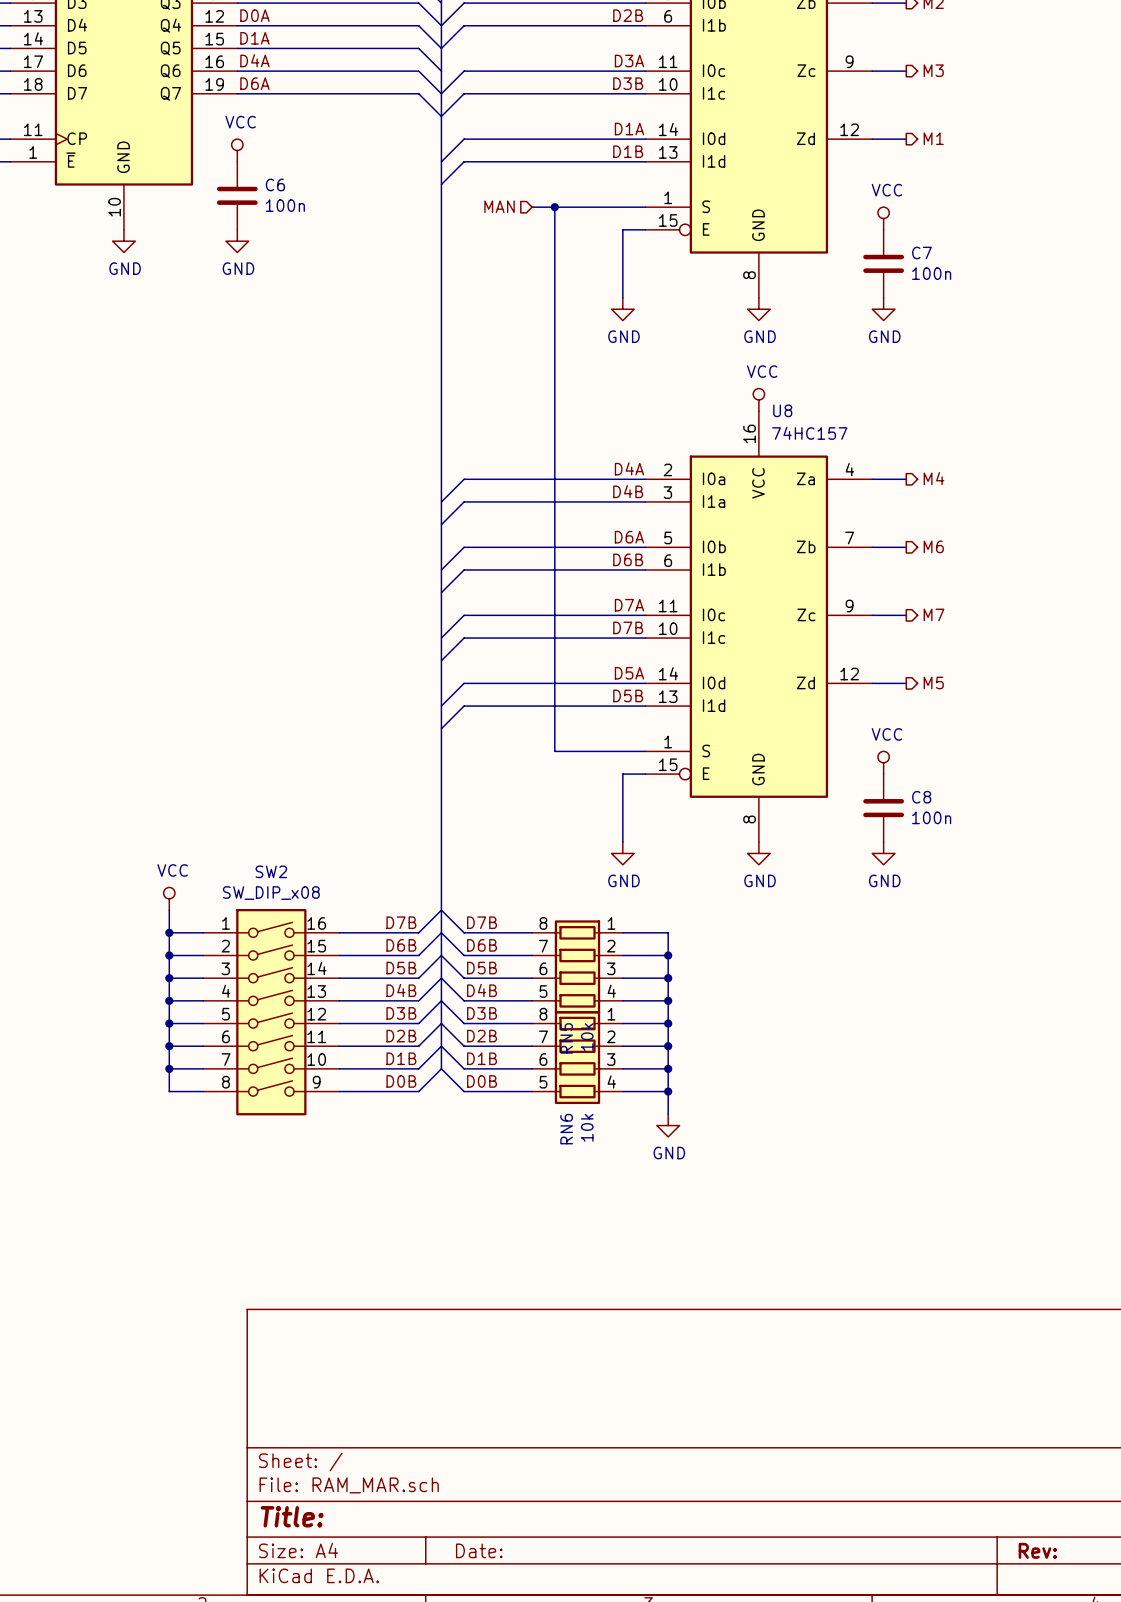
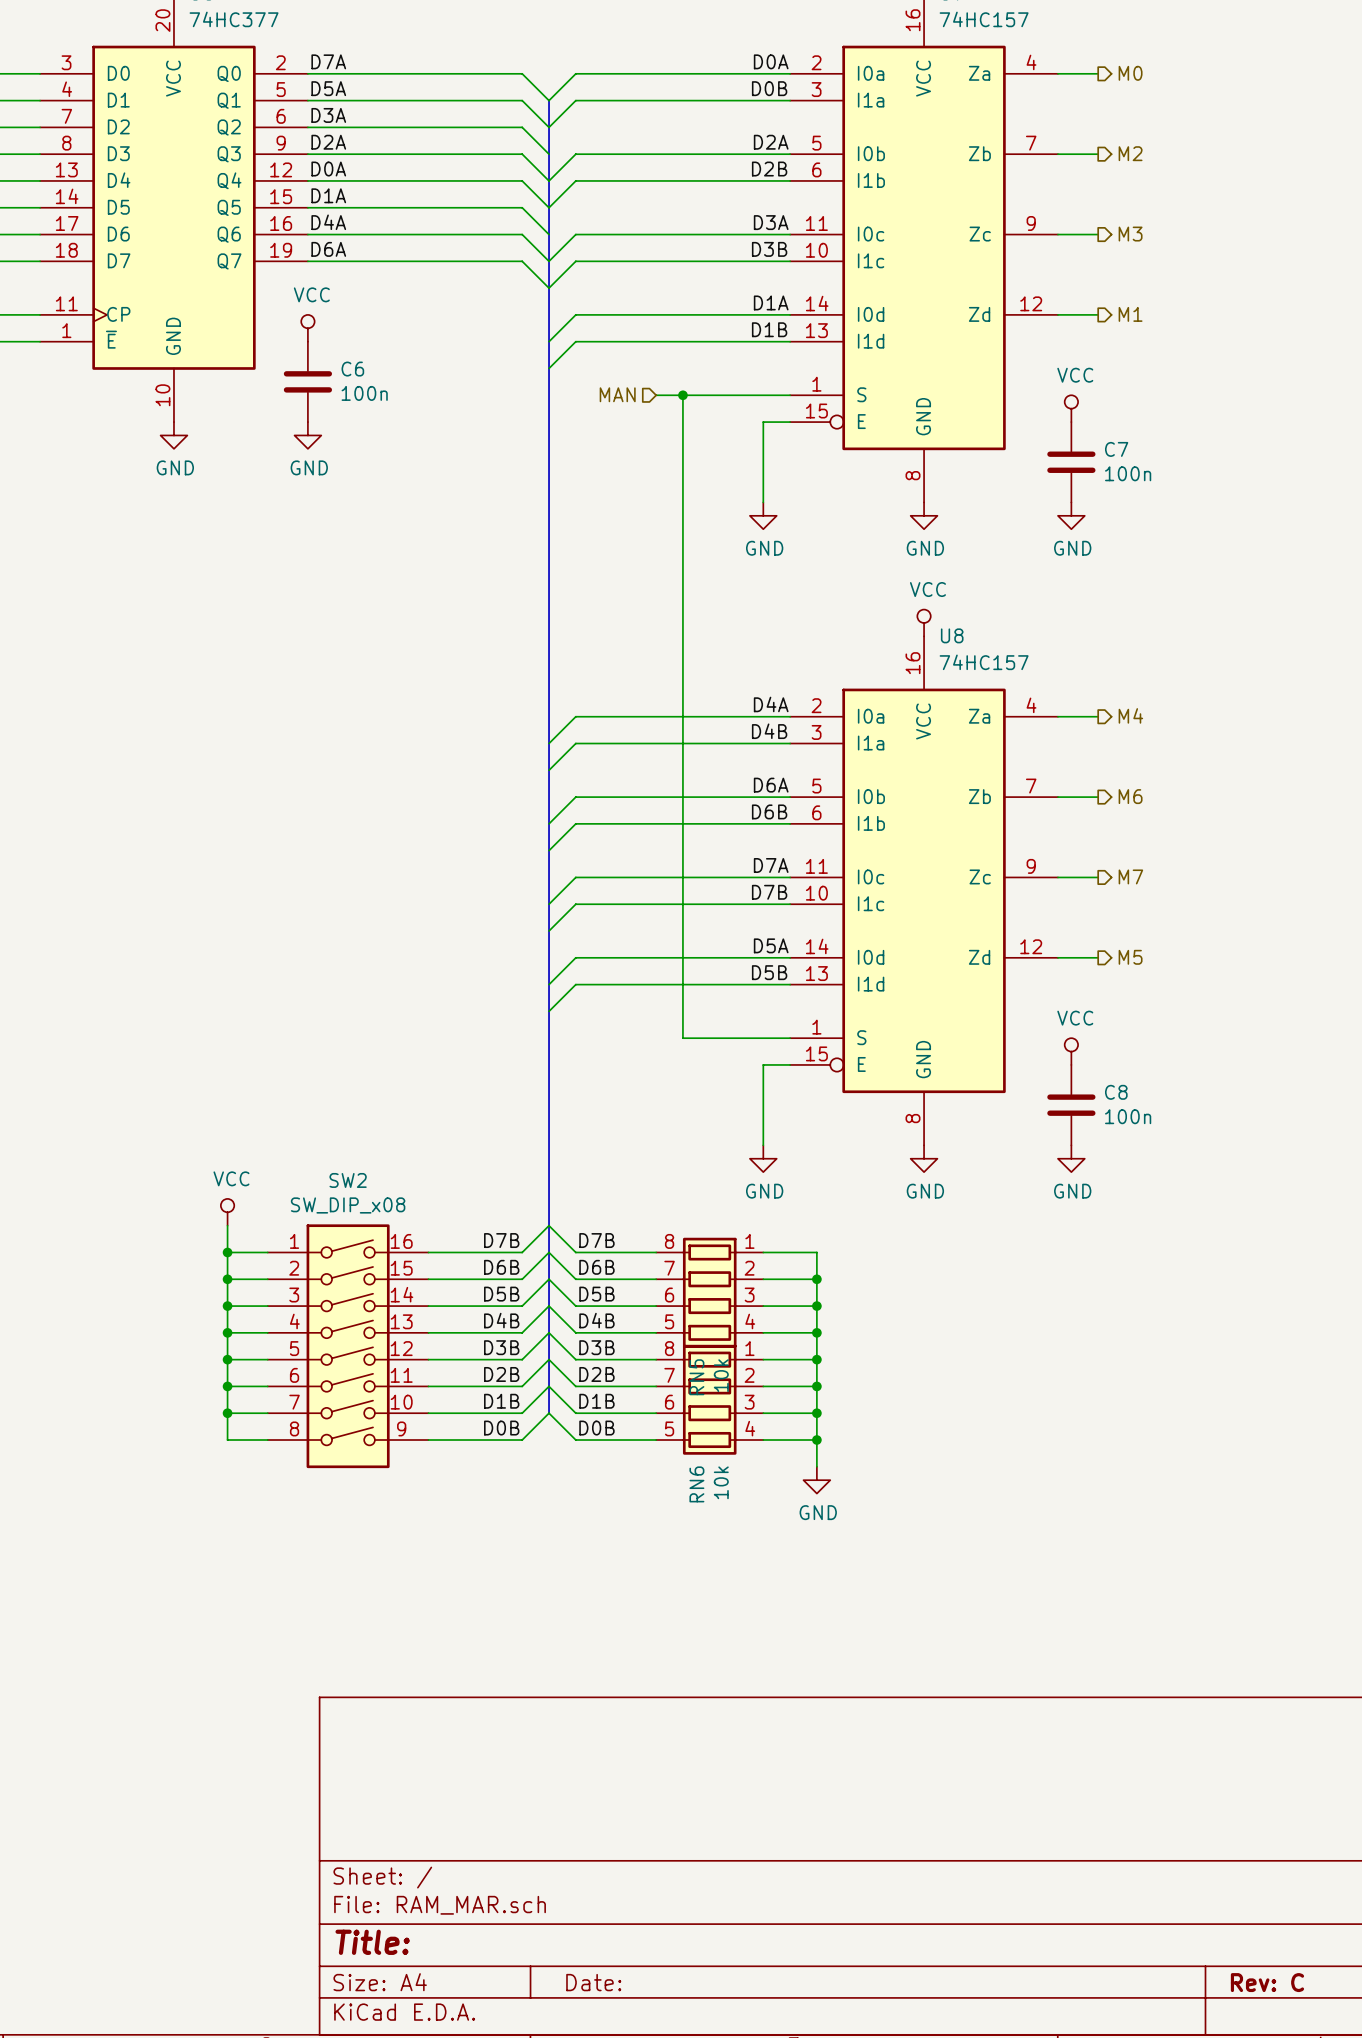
title block: Rev: (1037, 1550) -> Rev: C (1267, 1982)

